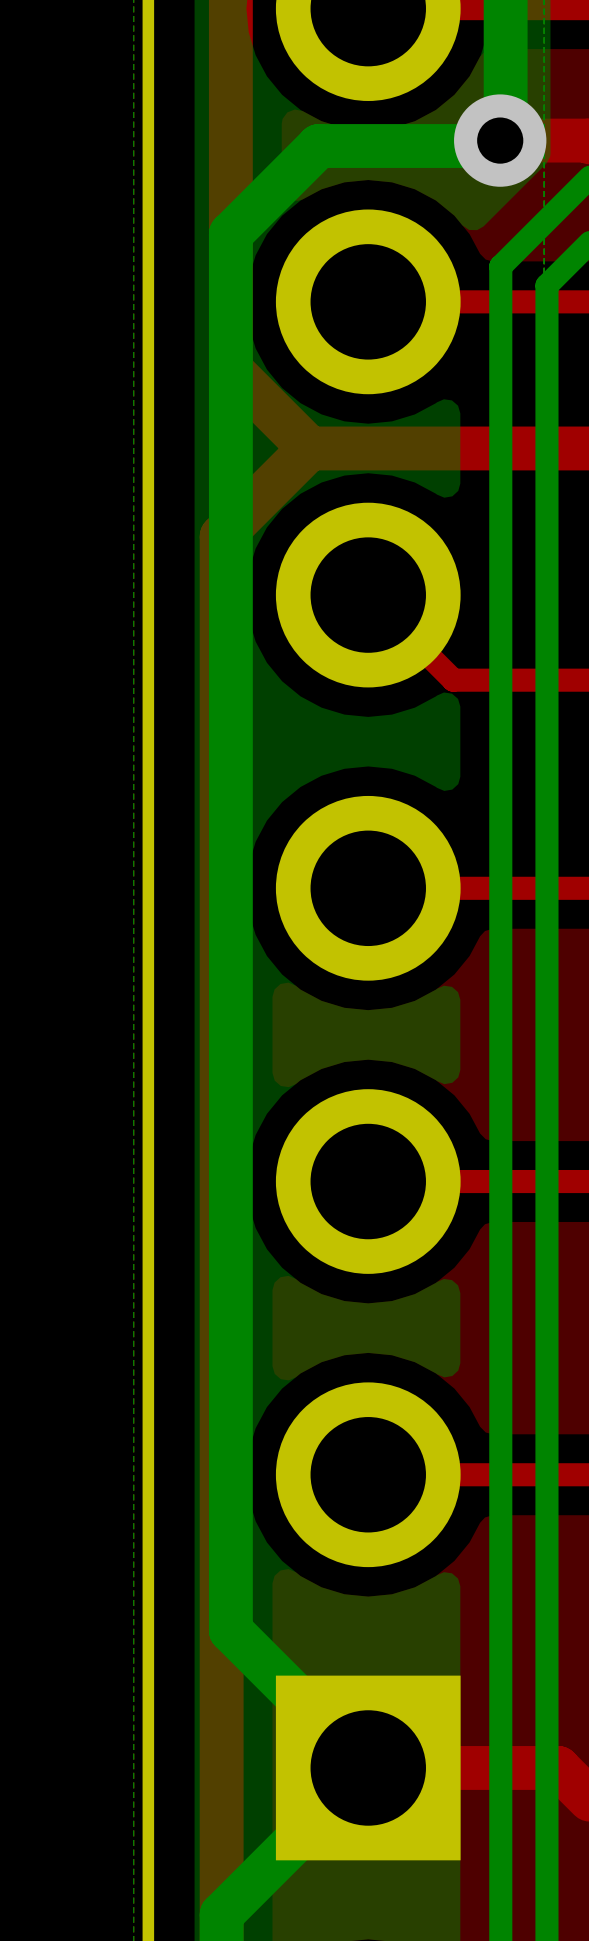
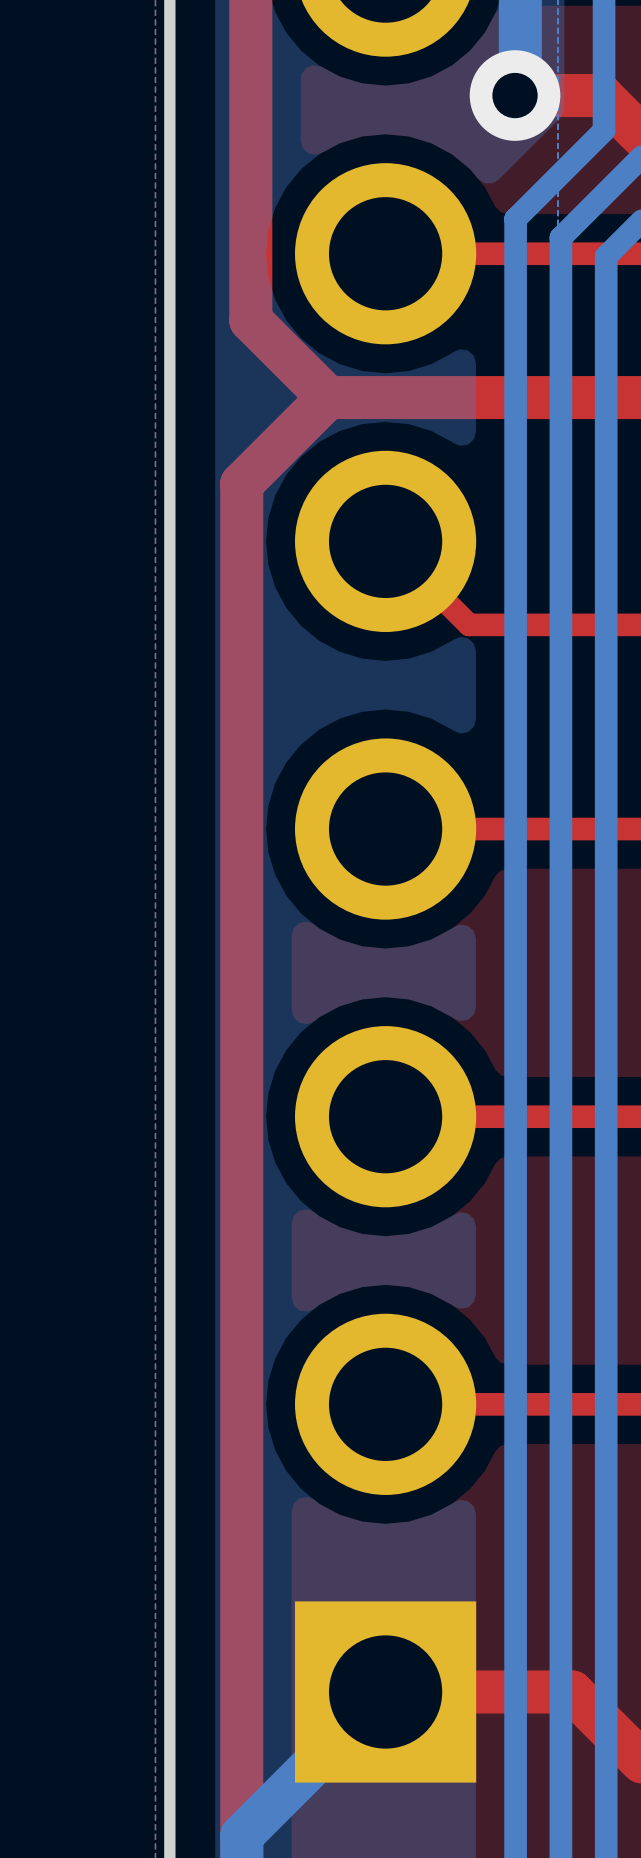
bottom track: (500, 140) (494, 146) (318, 146) (230, 233) (230, 1630) (368, 1767) -> none

